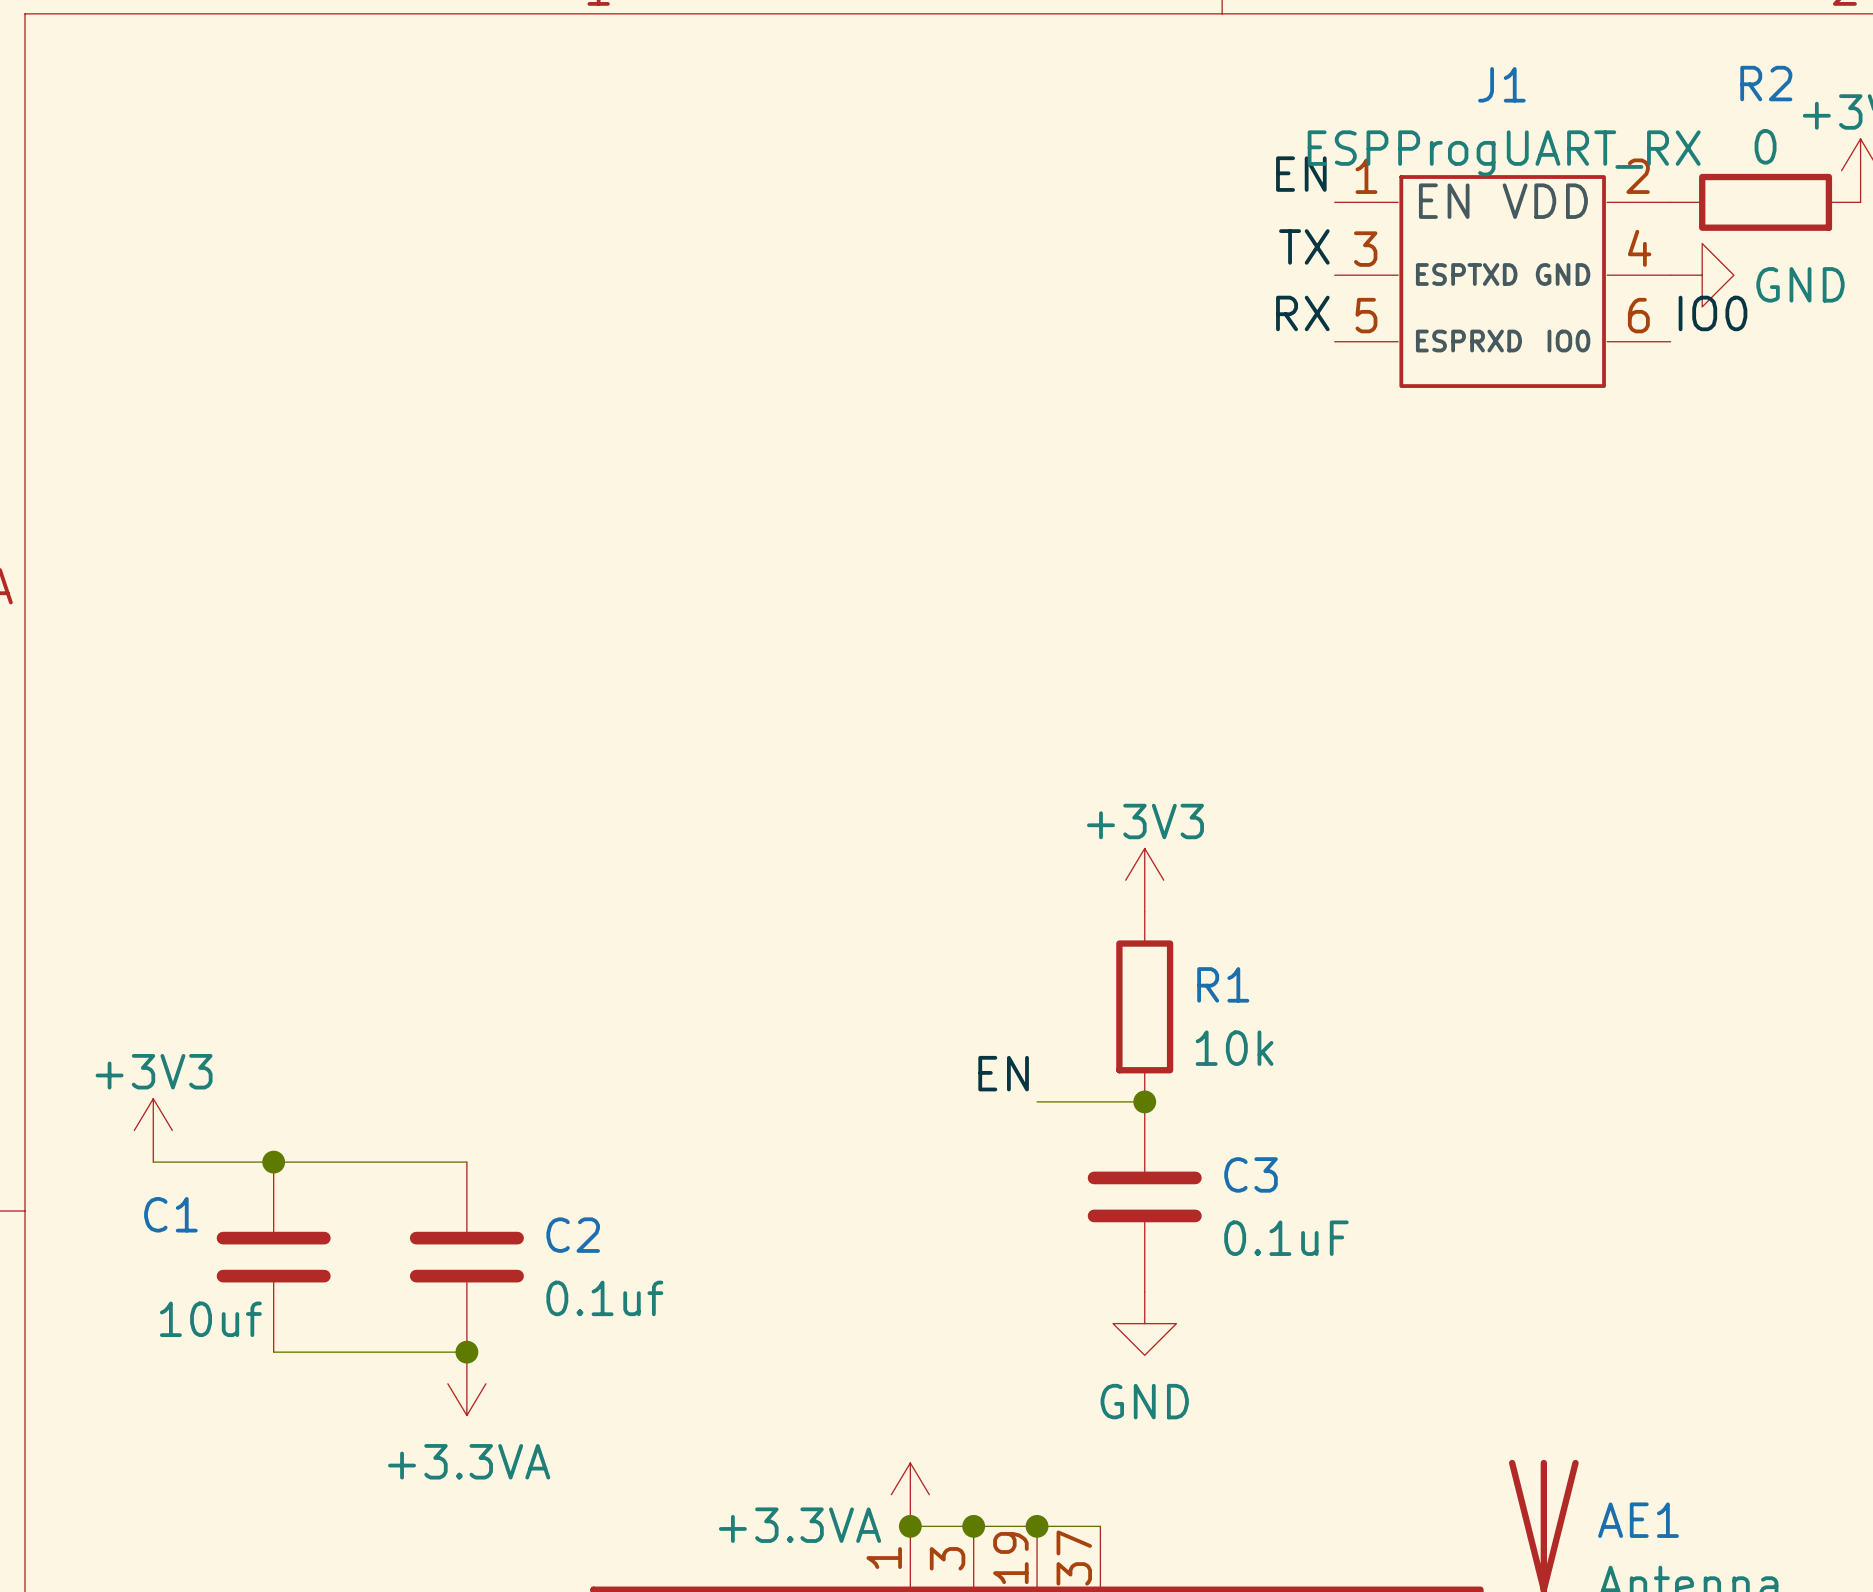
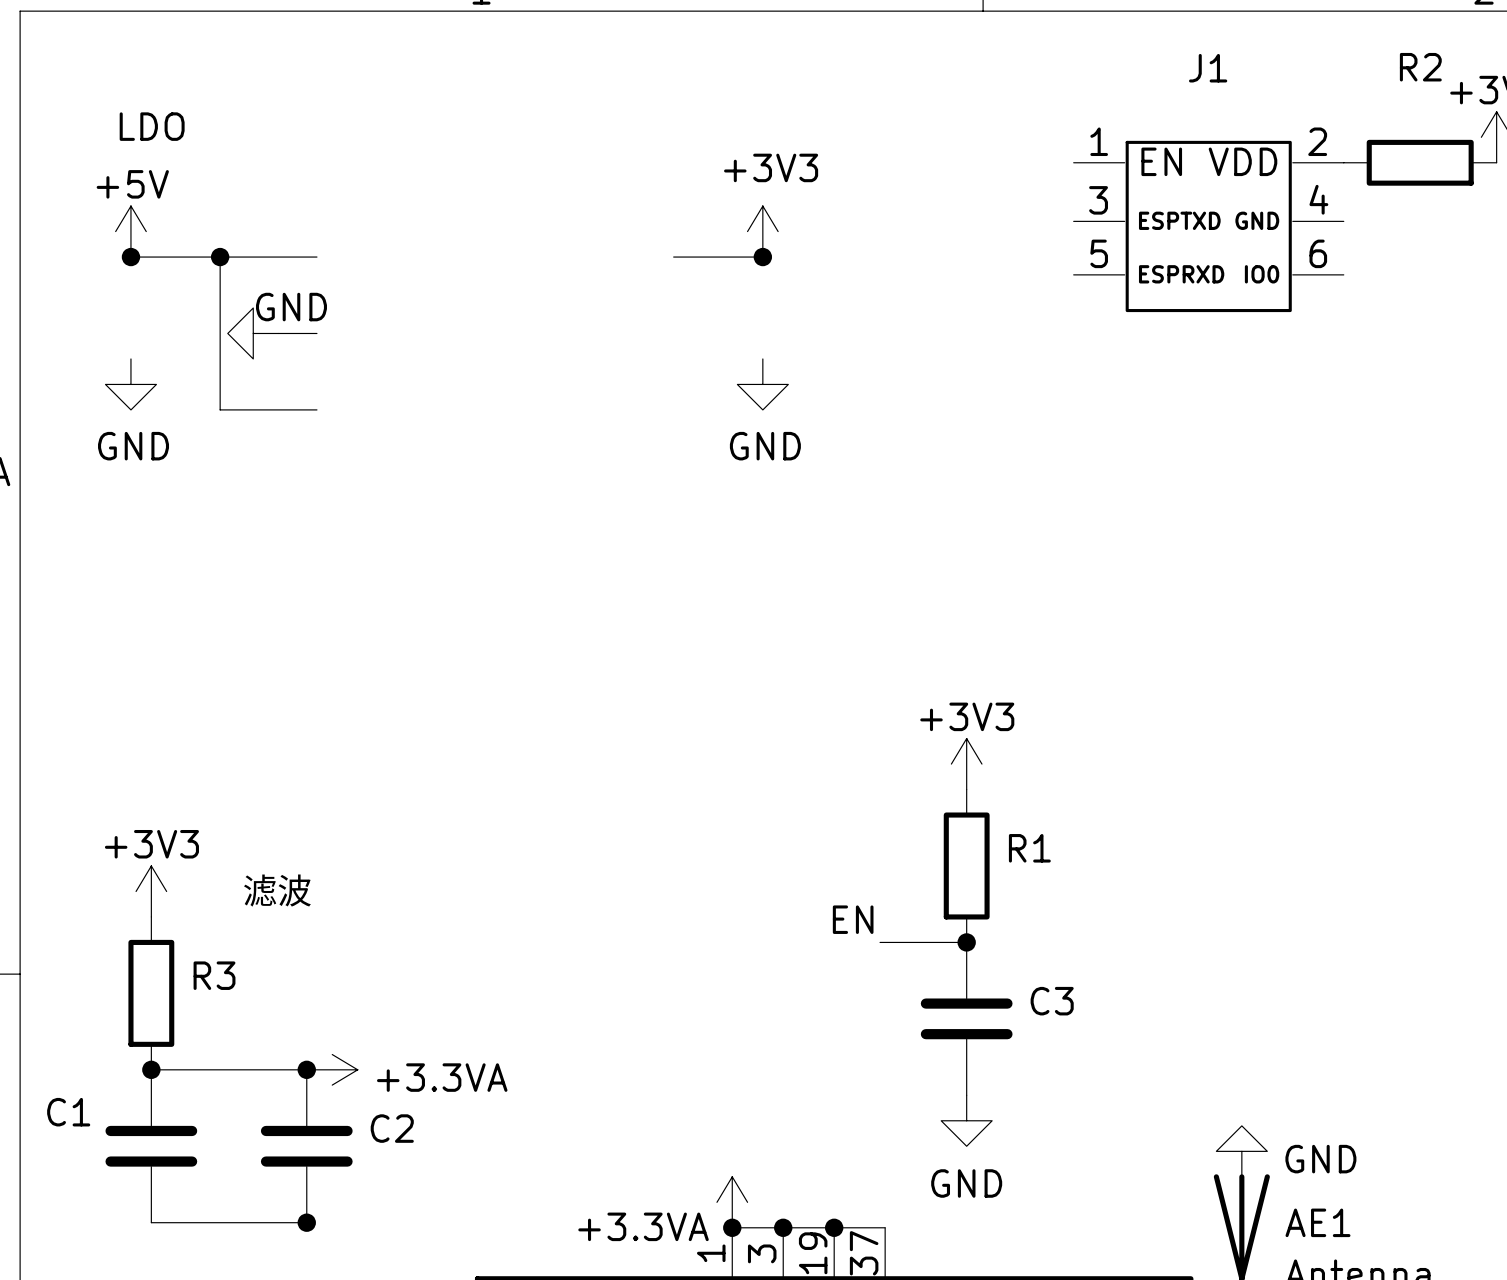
R2 value: 0 (1765, 146) -> none
J1 value: ESPProgUART_RX (1504, 153) -> none
text: none -> LDO (152, 126)
label: EN (1301, 174) -> none
label: TX (1304, 246) -> none
power symbol: GND (1702, 275) -> none
power symbol: none -> +5V (130, 231)
power symbol: none -> +3V3 (762, 231)
label: RX (1302, 313) -> none
label: IO0 (1713, 313) -> none
wire: none -> (130, 257) (316, 257)
junction: none -> (130, 257)
wire: none -> (220, 257) (220, 409) (316, 409)
junction: none -> (220, 257)
wire: none -> (673, 257) (762, 257)
junction: none -> (762, 257)
power symbol: none -> GND (253, 333)
wire: none -> (278, 333) (316, 333)
power symbol: none -> GND (130, 384)
power symbol: none -> GND (762, 384)
power symbol position: +3V3 (1144, 880) -> +3V3 (966, 764)
R1 position: (1144, 1006) -> (966, 865)
R1 value: 10k (1234, 1048) -> none
label position: EN (1003, 1073) -> EN (853, 919)
wire: (1037, 1101) (1144, 1101) -> (880, 942) (966, 942)
junction position: (1144, 1101) -> (966, 942)
text: none -> 滤波 (277, 890)
power symbol position: +3V3 (153, 1130) -> +3V3 (151, 891)
wire: (153, 1162) (466, 1162) -> none
junction: (273, 1162) -> none
C3 position: (1144, 1196) -> (966, 1018)
R3: none -> (151, 993)
C3 value: 0.1uF (1286, 1238) -> none
C1 position: (273, 1257) -> (151, 1146)
C2 position: (466, 1257) -> (306, 1146)
C2 value: 0.1uf (604, 1298) -> none
C1 value: 10uf (210, 1319) -> none
power symbol position: GND (1144, 1323) -> GND (966, 1120)
junction: none -> (151, 1069)
wire: (273, 1352) (466, 1352) -> (151, 1069) (306, 1069)
junction position: (466, 1352) -> (306, 1069)
power symbol rotation: 0° (466, 1383) -> 90° counterclockwise (332, 1069)
power symbol position: +3.3VA (466, 1383) -> +3.3VA (332, 1069)
power symbol: none -> GND (1241, 1151)
power symbol text position: +3.3VA (469, 1461) -> +3.3VA (442, 1077)
wire: none -> (151, 1222) (306, 1222)
junction: none -> (306, 1222)

